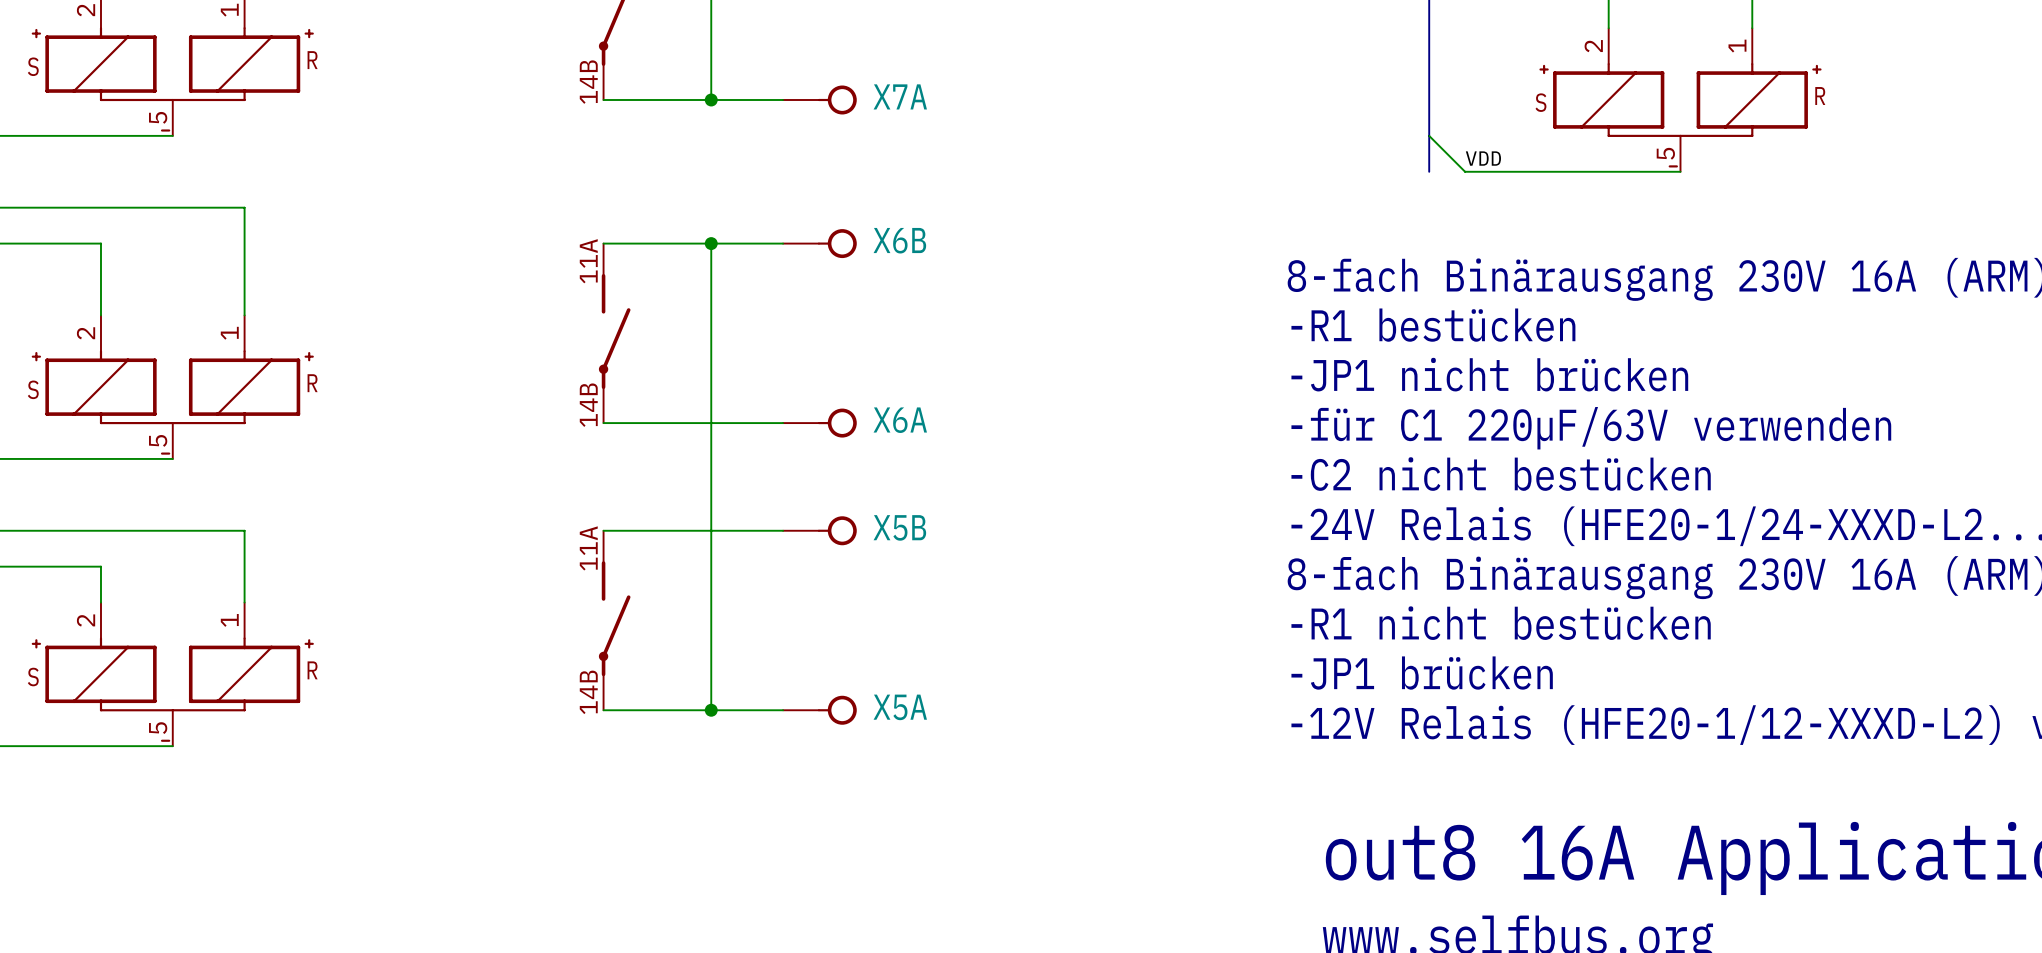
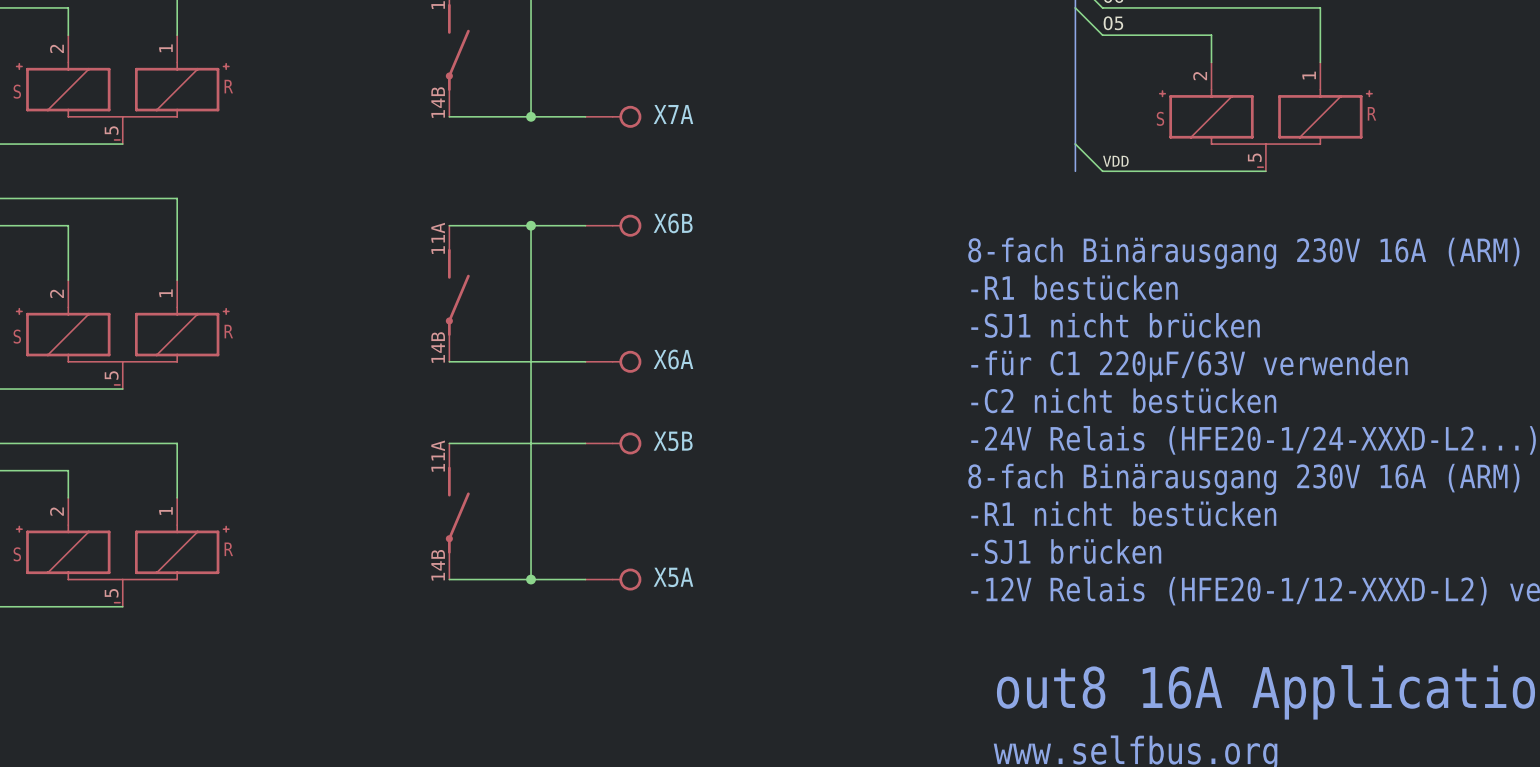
text: -JP1 nicht brücken (1489, 374) -> -SJ1 nicht brücken (1115, 325)
text: -JP1 brücken (1422, 673) -> -SJ1 brücken (1066, 551)

